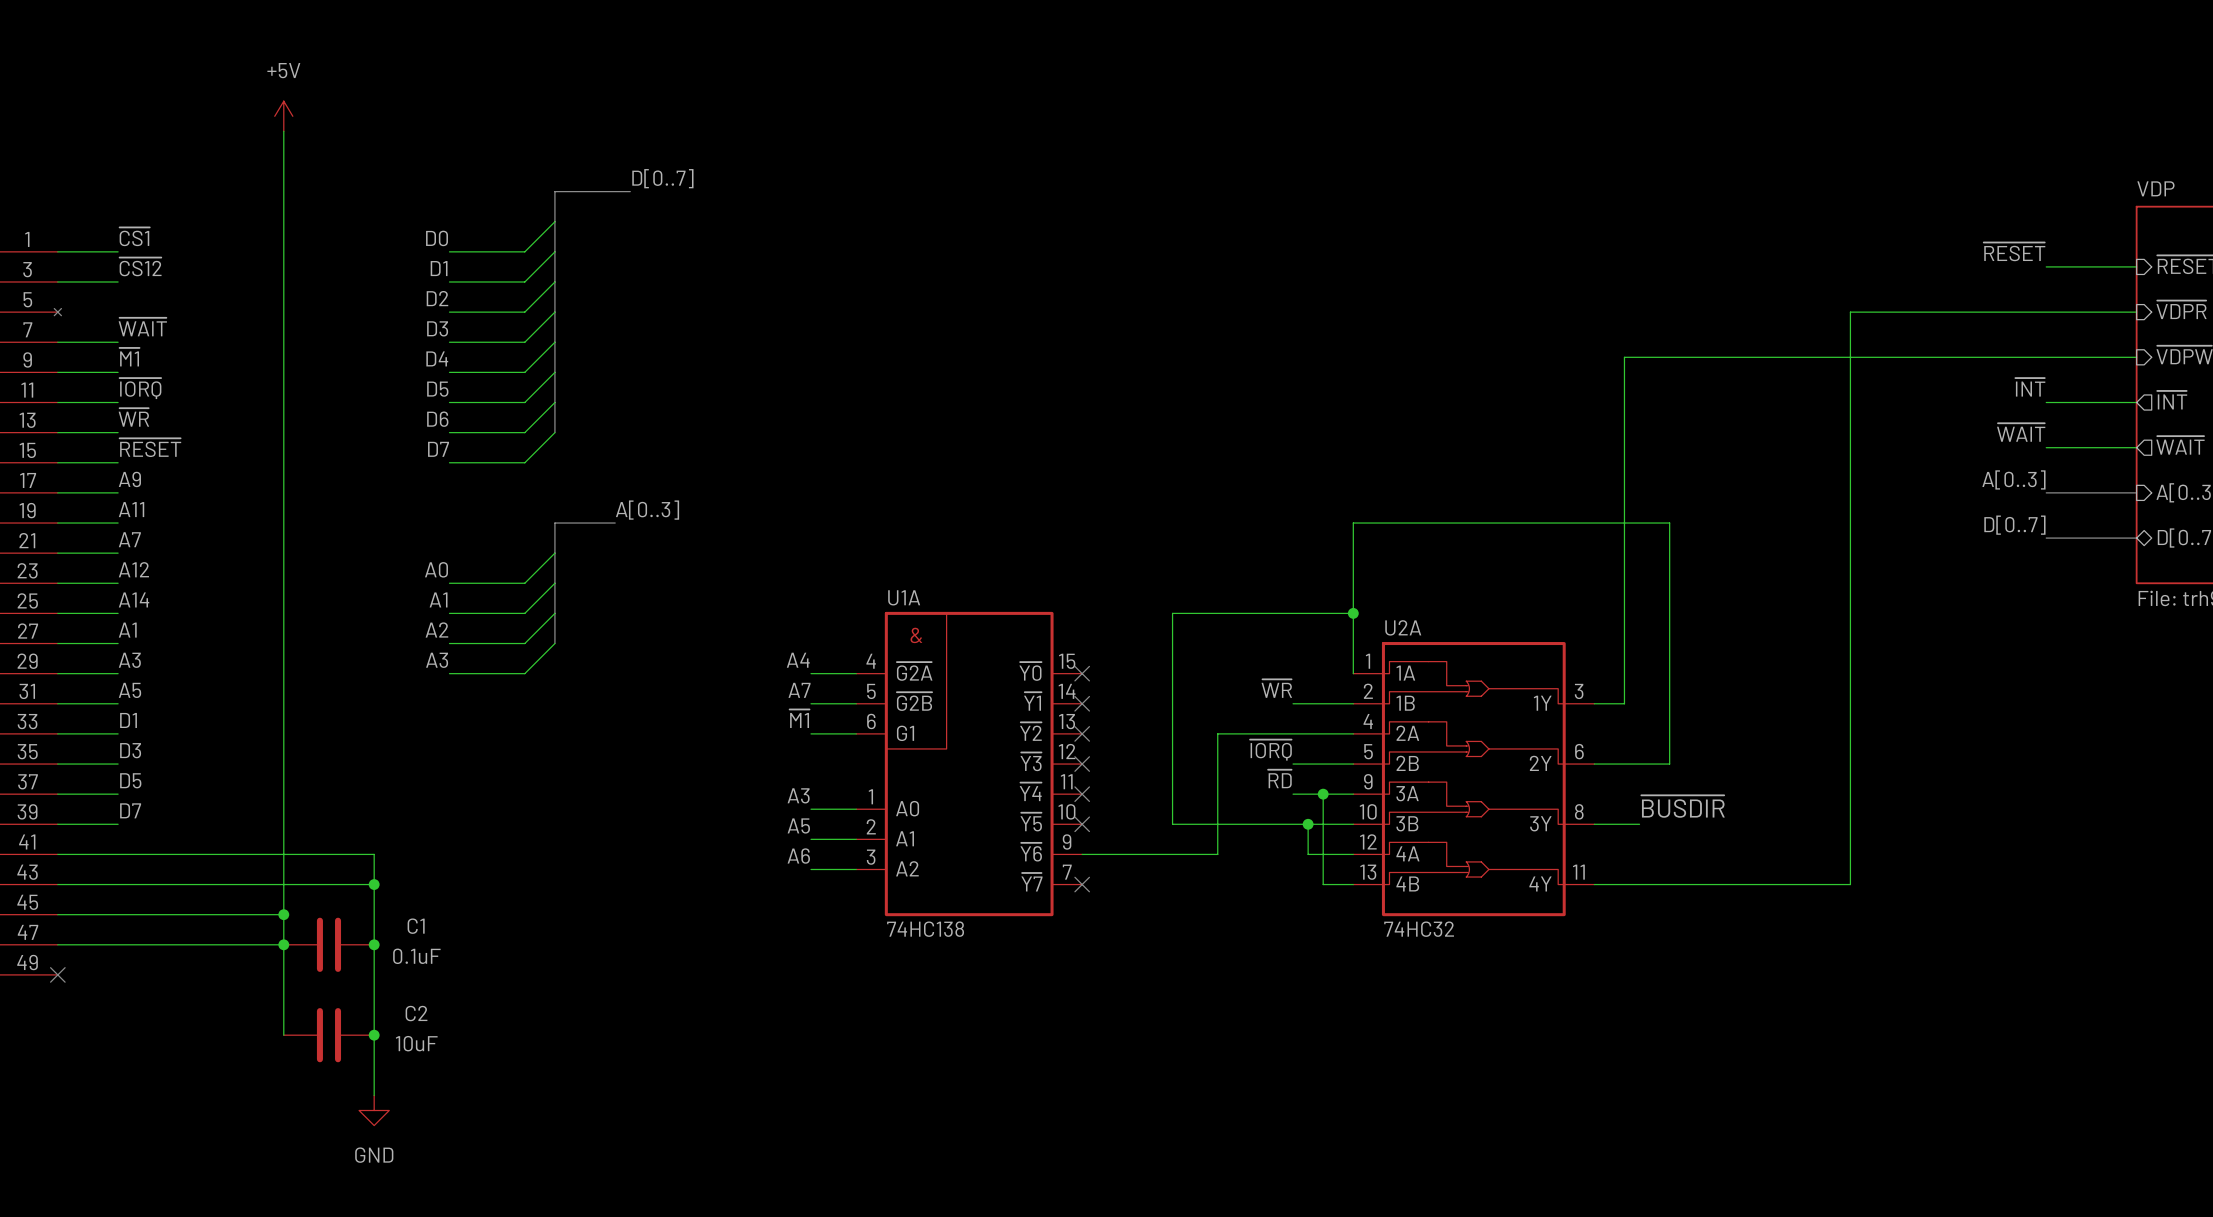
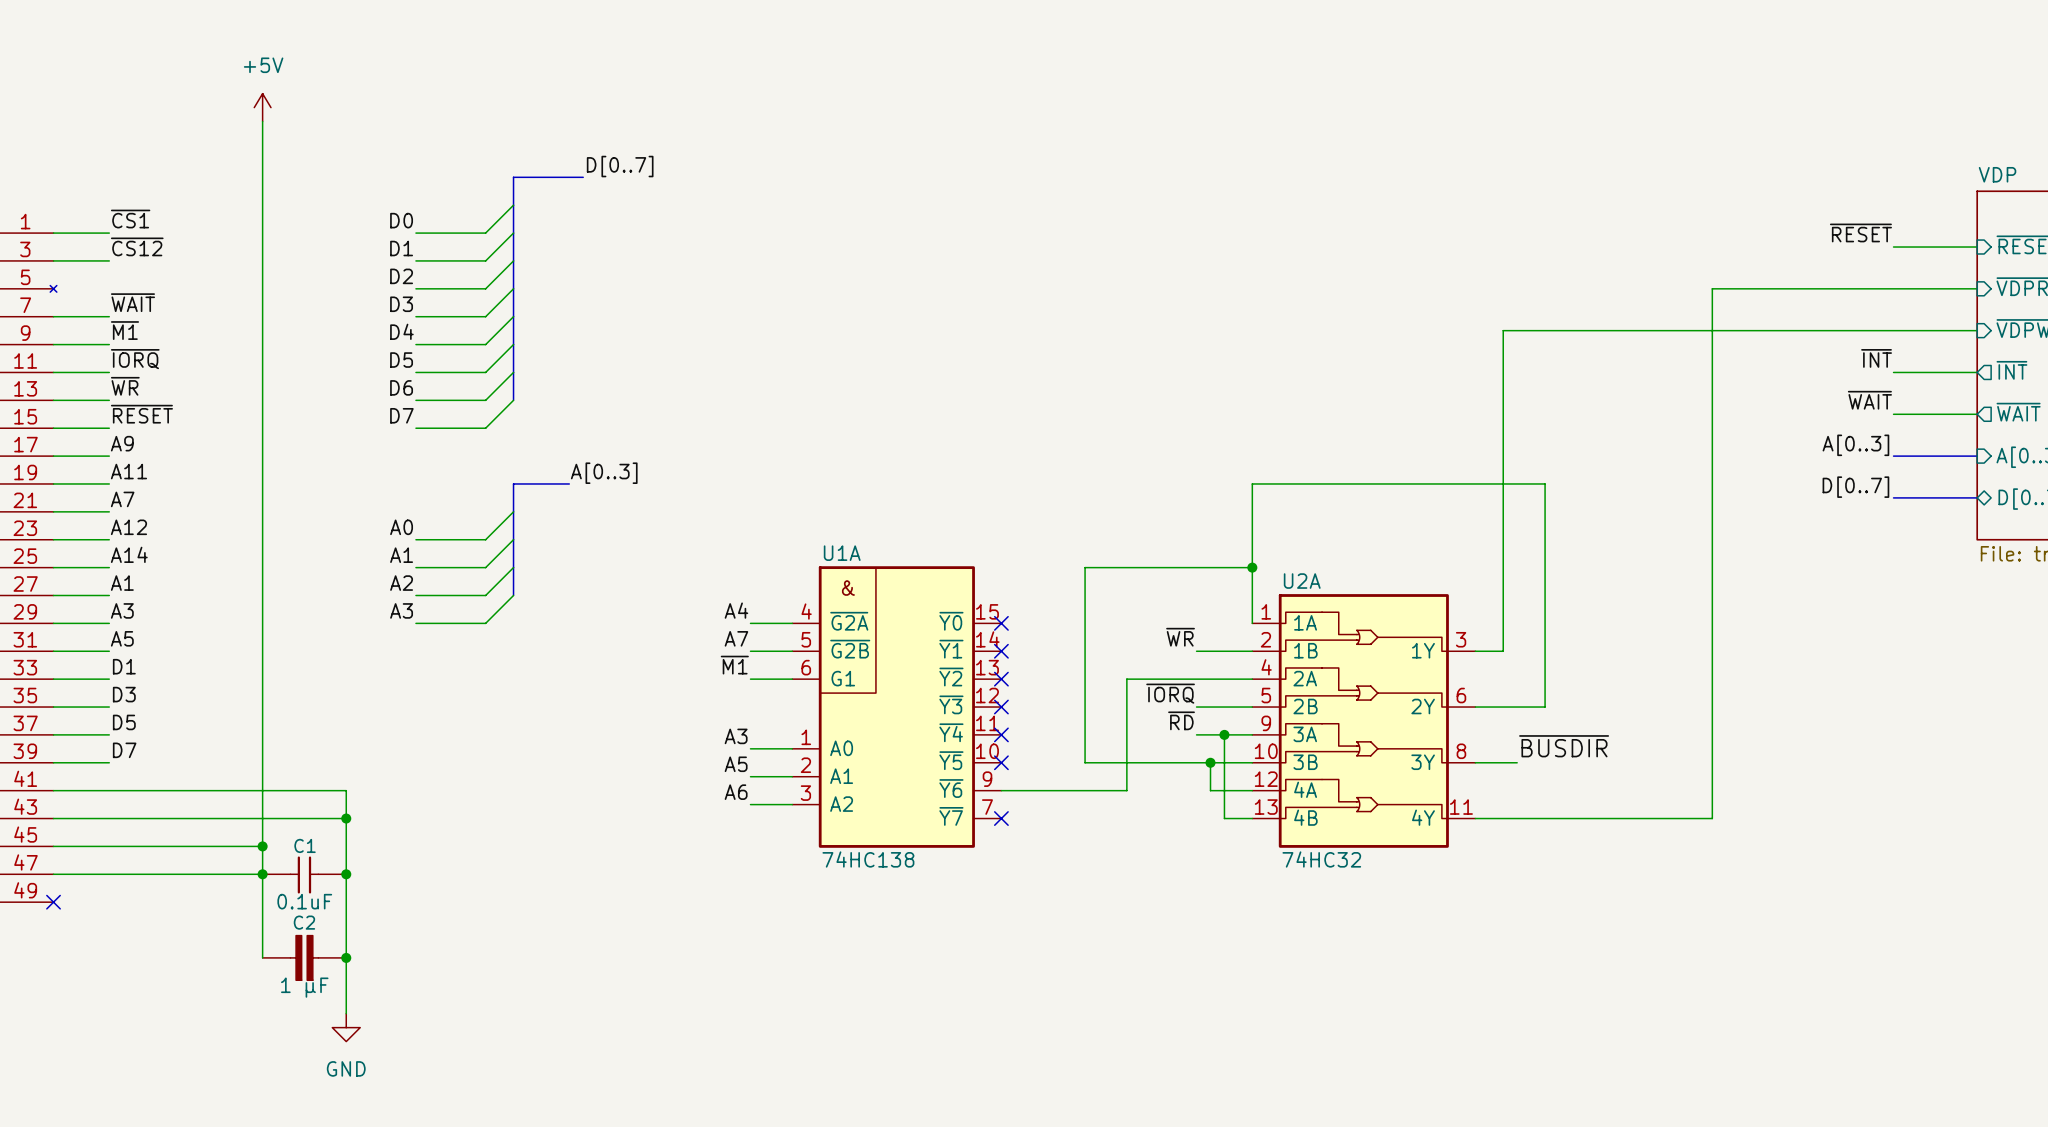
C1 symbol: [283, 917, 375, 972] -> [262, 856, 347, 894]
C1 name position: C1 (416, 926) -> C1 (305, 845)
C1 value: 0.1uF (416, 956) -> none
C1 text: none -> 0.1uF (304, 901)
C2 symbol: [283, 1008, 375, 1063] -> [262, 935, 347, 981]
C2 name position: C2 (416, 1013) -> C2 (304, 922)
C2 value: 10uF (416, 1043) -> none
C2 text: none -> 1 µF (304, 987)

